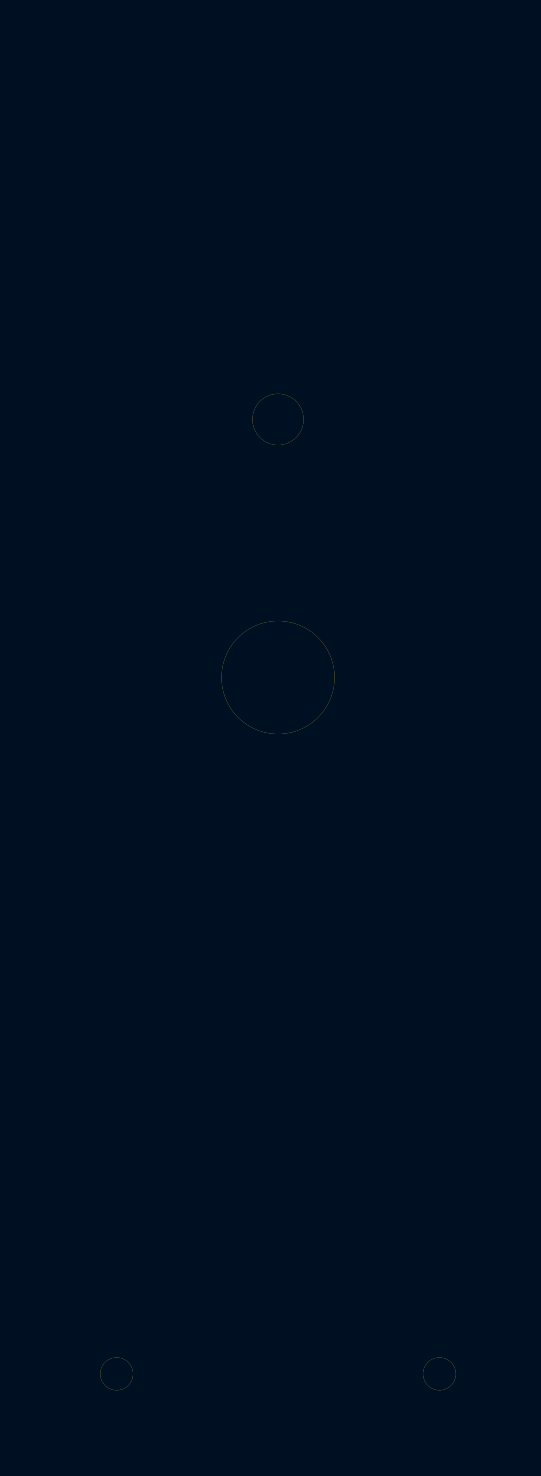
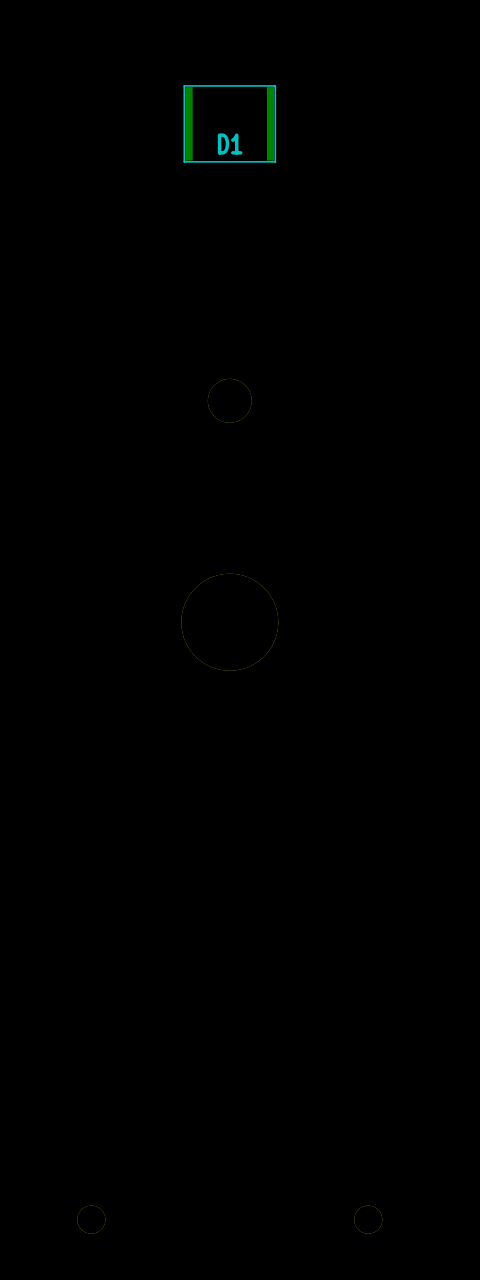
D1: none -> (229, 123)

